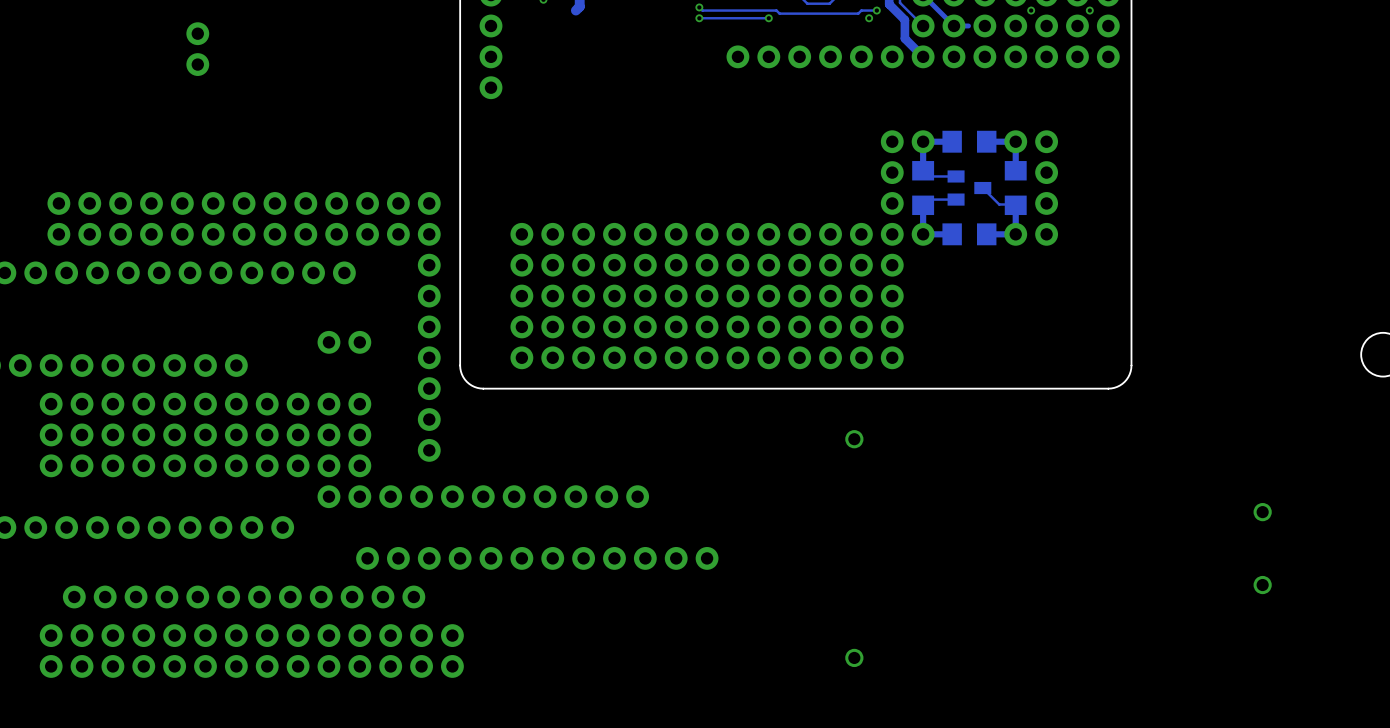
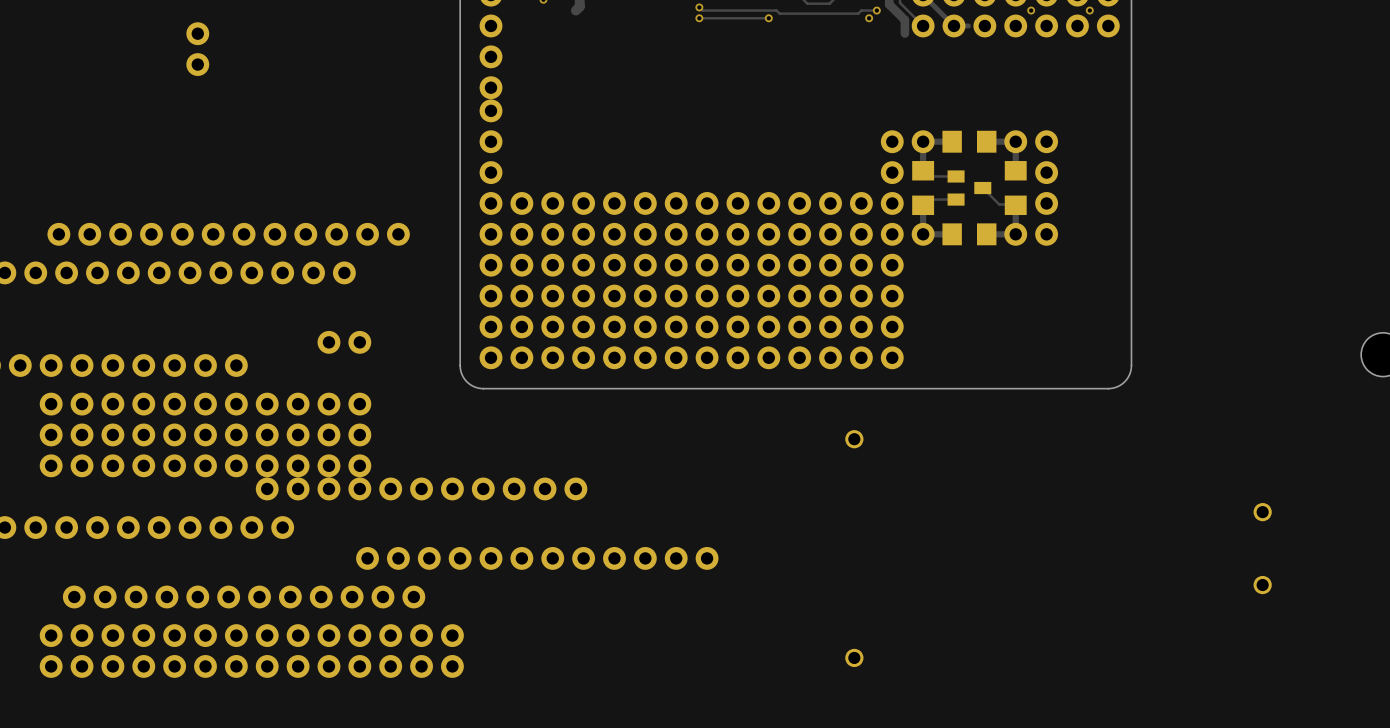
track: (904, 33) (904, 38) (923, 56) -> none
part: (768, 56) -> none
part: (861, 56) -> none
part: (938, 56) -> none
part: (1046, 56) -> none
part: (228, 203) -> none
part: none -> (691, 203)
part position: (429, 326) -> (491, 234)
part position: (483, 496) -> (421, 488)

